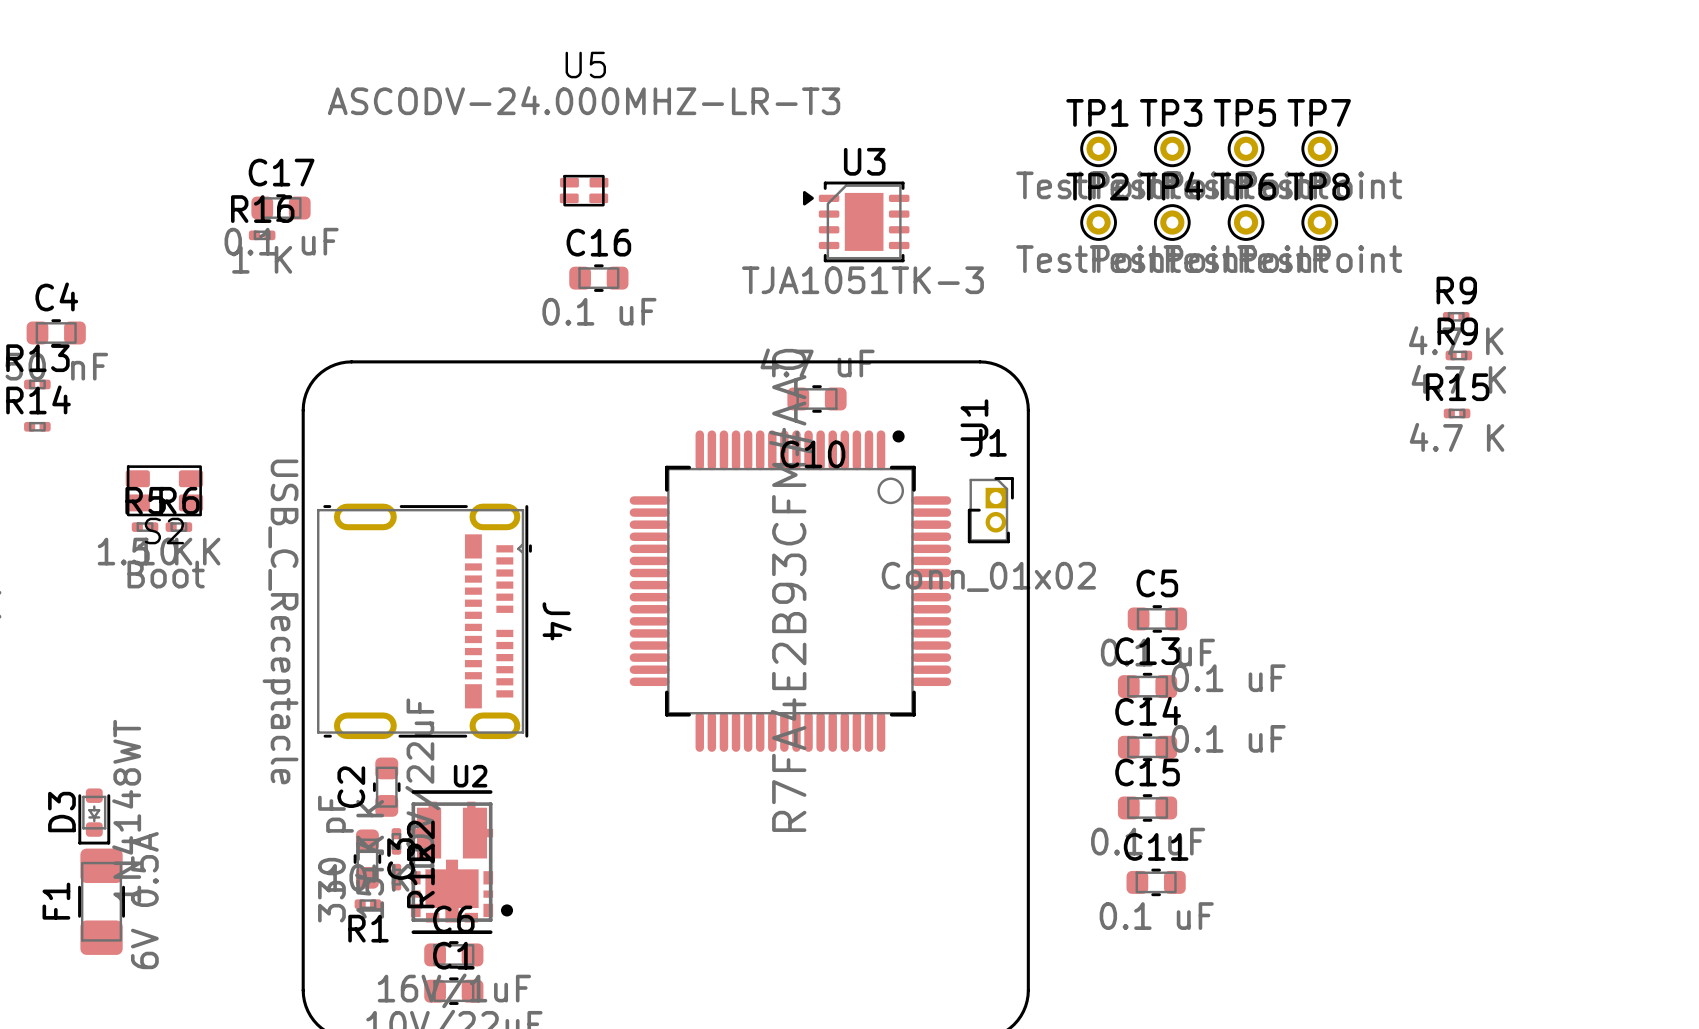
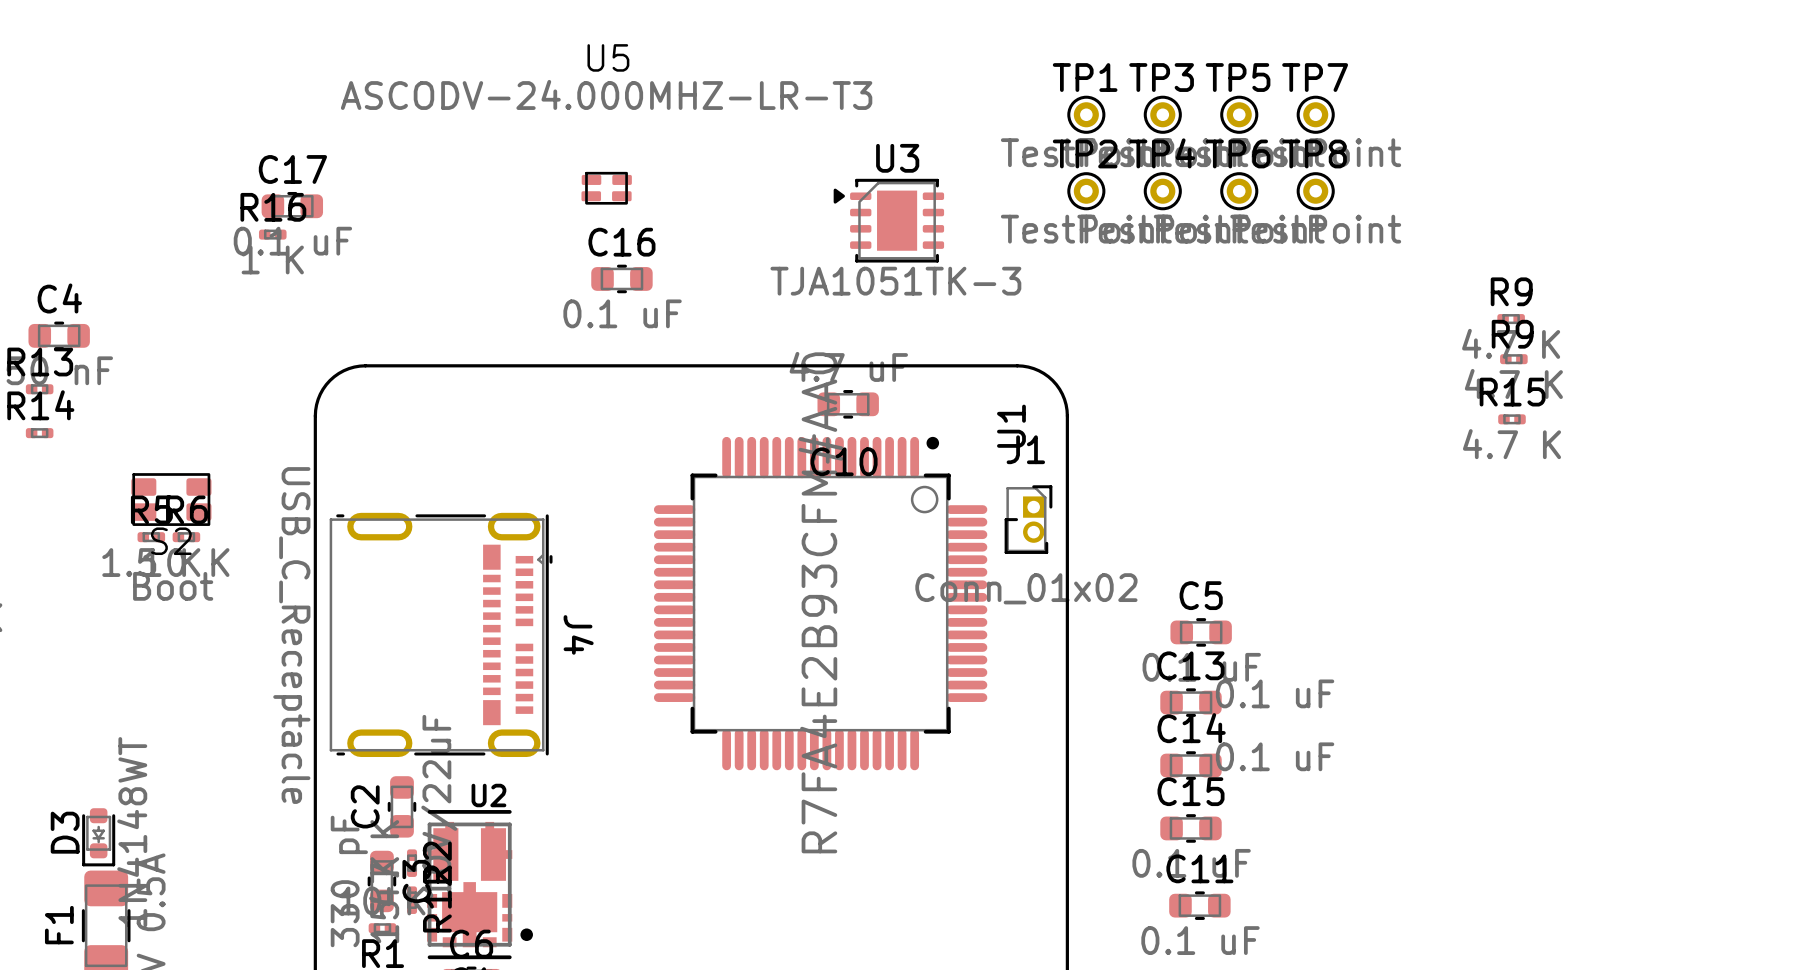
TP1 position: (1098, 148) -> (1086, 114)
TP3 position: (1172, 148) -> (1162, 114)
TP5 position: (1246, 148) -> (1239, 114)
TP7 position: (1319, 148) -> (1315, 114)
TP2 position: (1098, 222) -> (1086, 191)
TP4 position: (1172, 222) -> (1162, 191)
TP6 position: (1246, 222) -> (1239, 191)
TP8 position: (1319, 222) -> (1315, 191)

